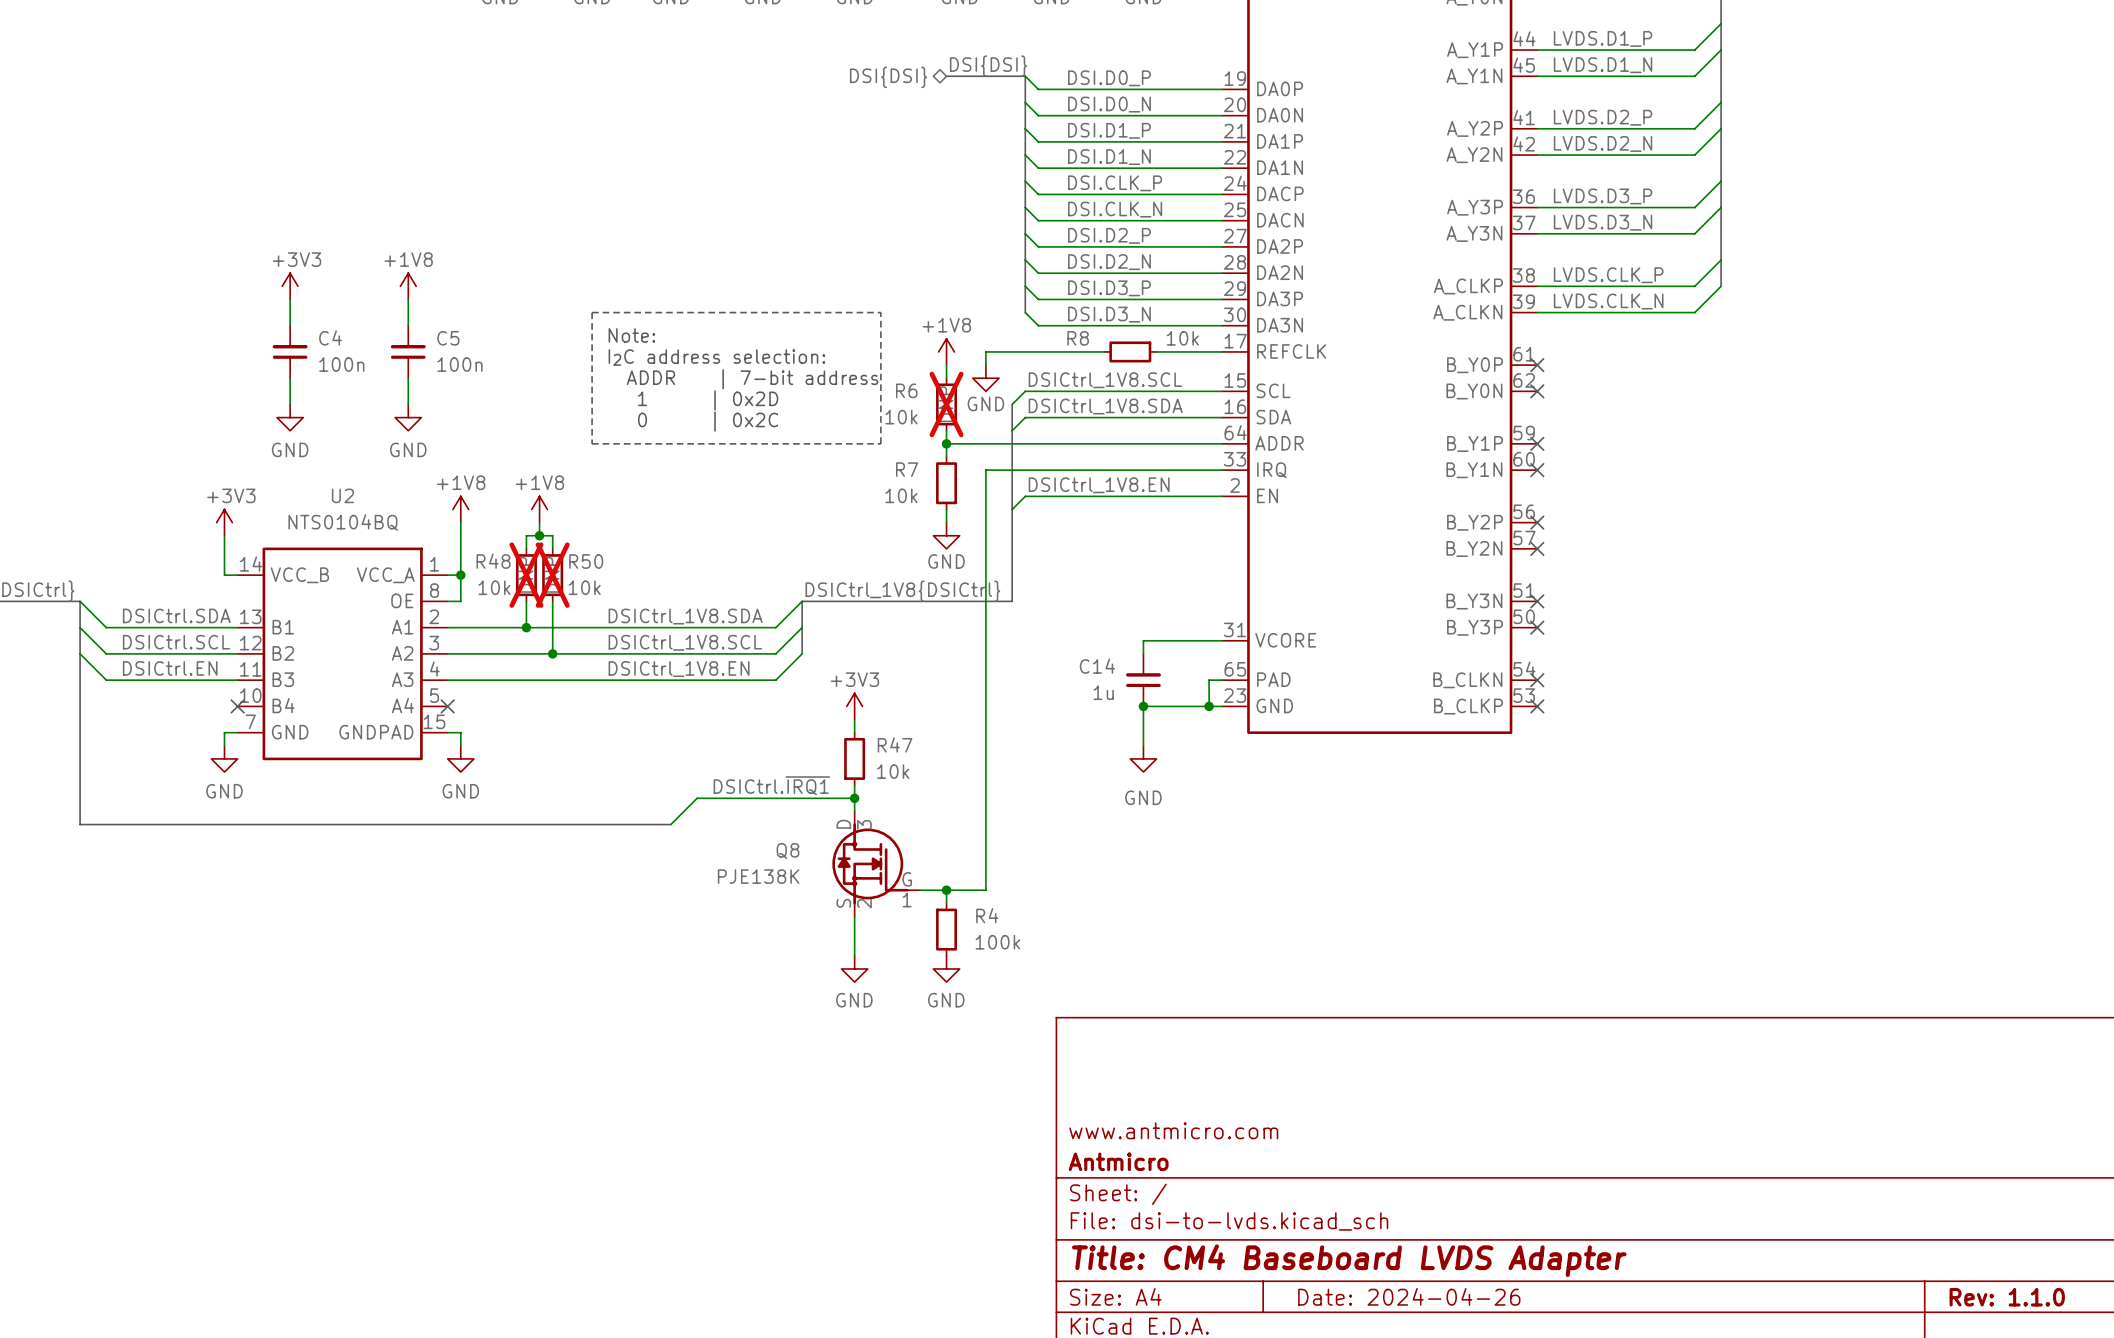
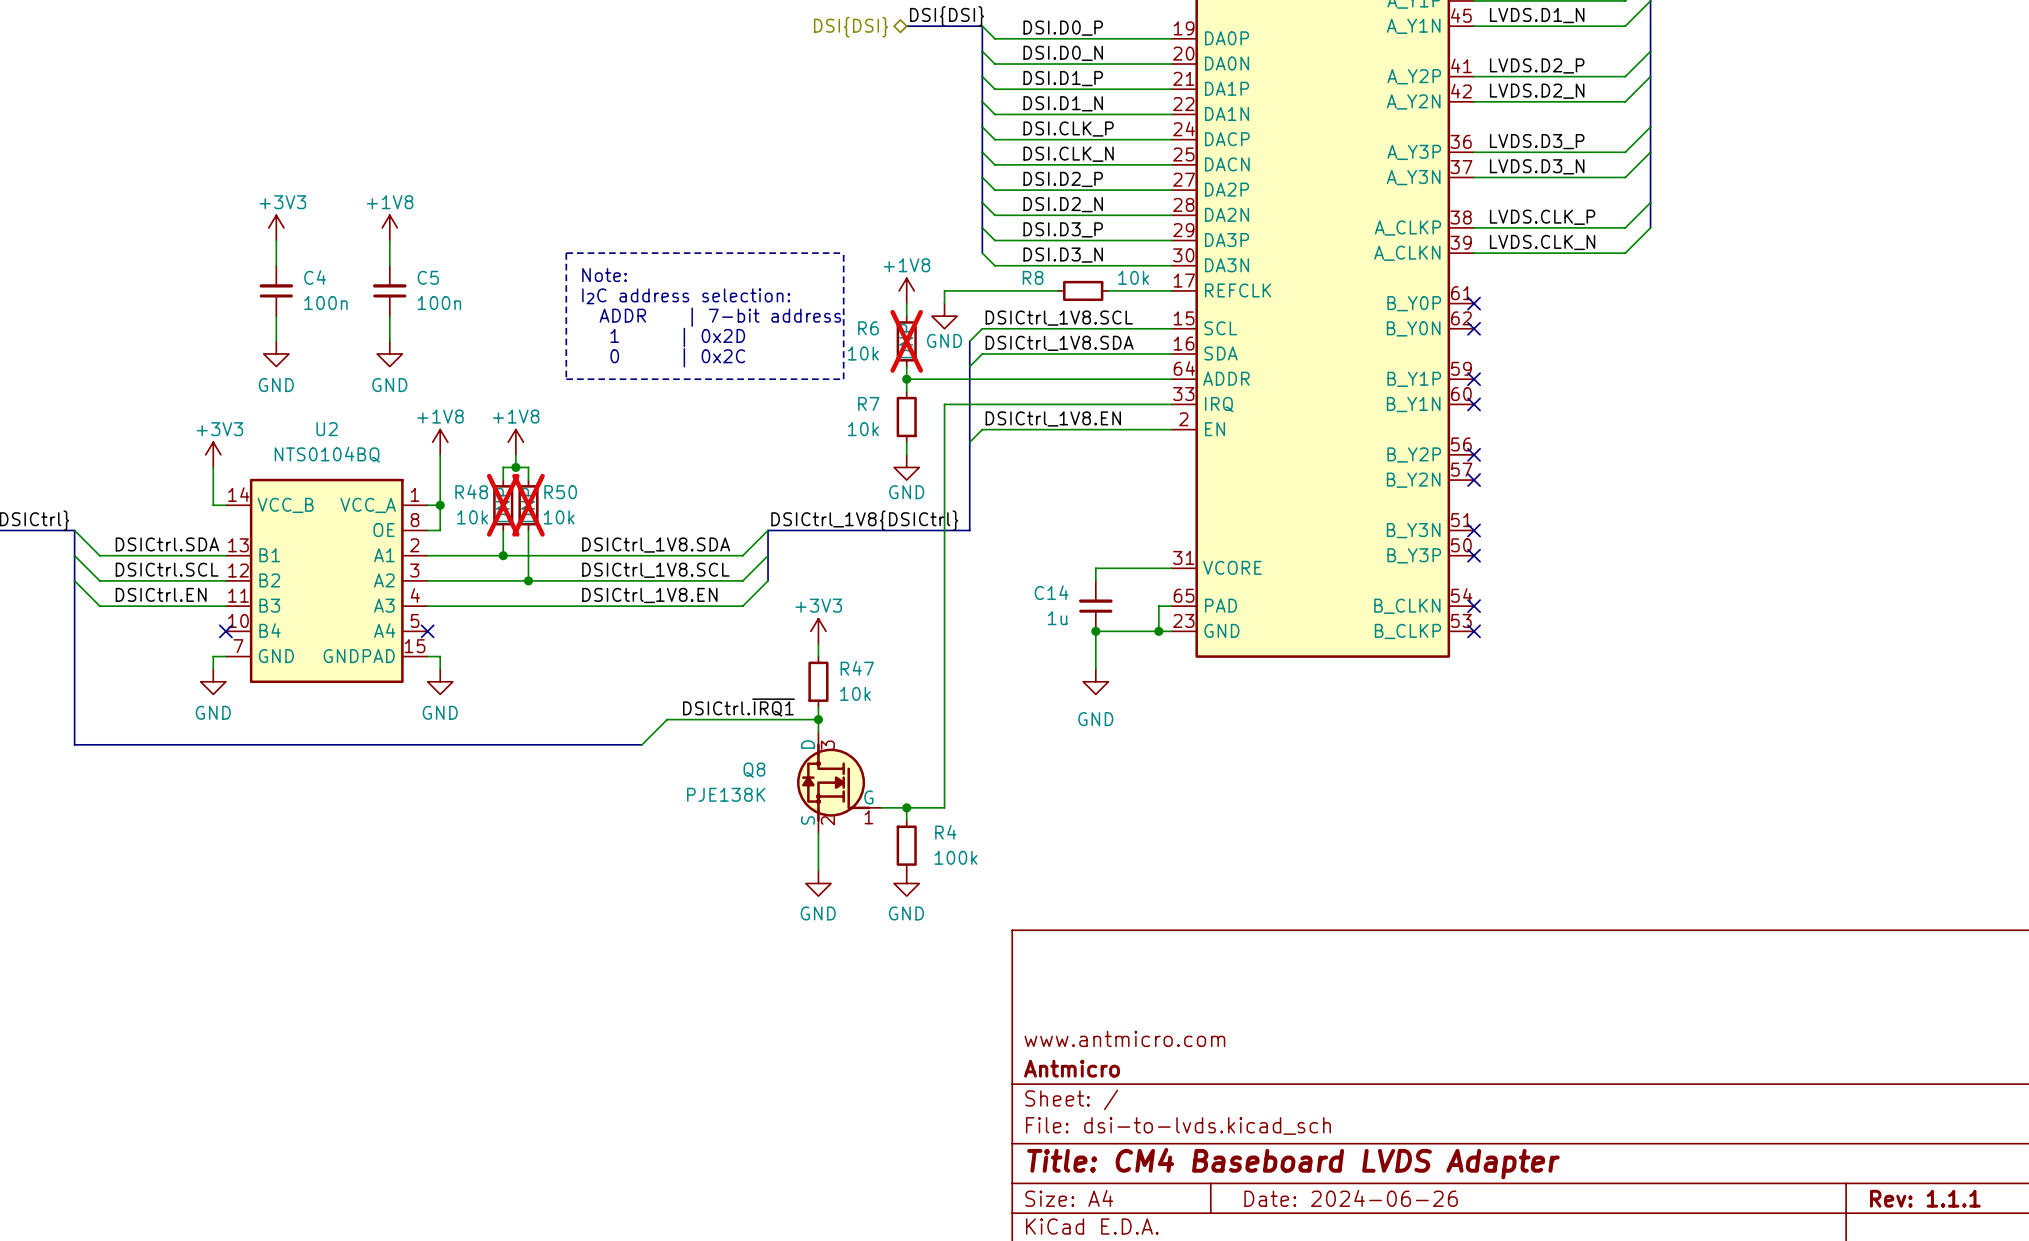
title block: Date: 2024-04-26 (1409, 1296) -> Date: 2024-06-26 (1351, 1198)
title block: Rev: 1.1.0 (2007, 1297) -> Rev: 1.1.1 (1925, 1198)

